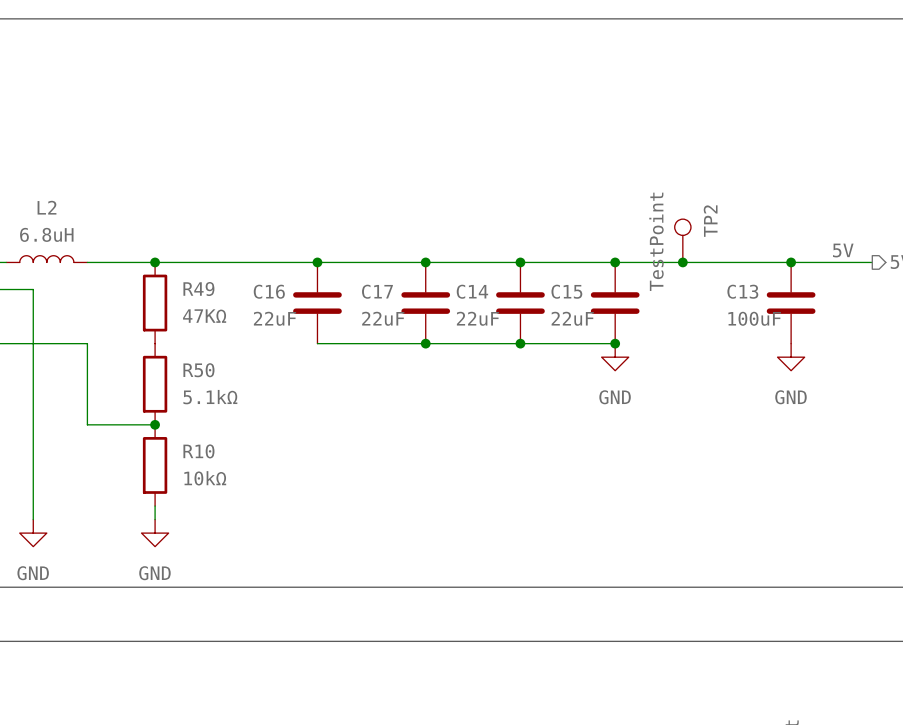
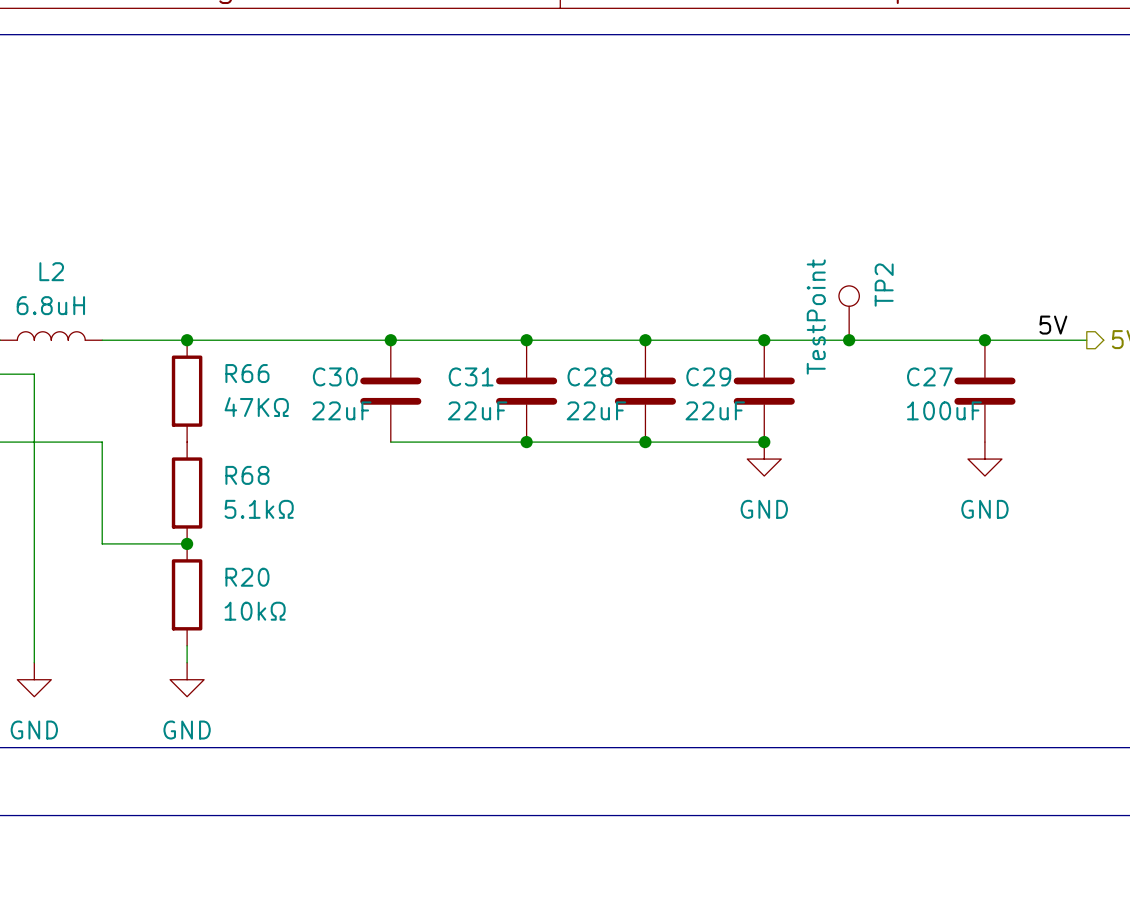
R49 name: R49 (198, 289) -> R66 (247, 373)
C16 name: C16 (269, 291) -> C30 (335, 376)
C17 name: C17 (377, 291) -> C31 (471, 376)
C14 name: C14 (472, 291) -> C28 (589, 376)
C15 name: C15 (566, 291) -> C29 (708, 376)
C13 name: C13 (742, 291) -> C27 (929, 376)
R50 name: R50 (198, 370) -> R68 (247, 475)
R10 name: R10 (198, 451) -> R20 (247, 577)

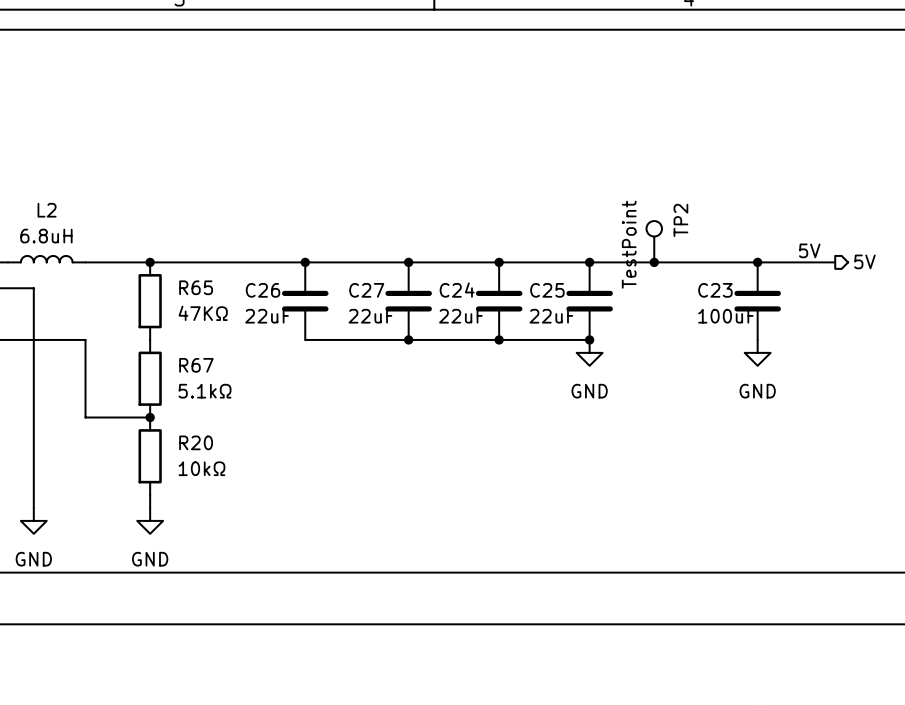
R66 name: R66 (247, 373) -> R65 (196, 287)
C30 name: C30 (335, 376) -> C26 (263, 290)
C31 name: C31 (471, 376) -> C27 (366, 290)
C28 name: C28 (589, 376) -> C24 (457, 290)
C29 name: C29 (708, 376) -> C25 (547, 290)
C27 name: C27 (929, 376) -> C23 (715, 290)
R68 name: R68 (247, 475) -> R67 (196, 365)

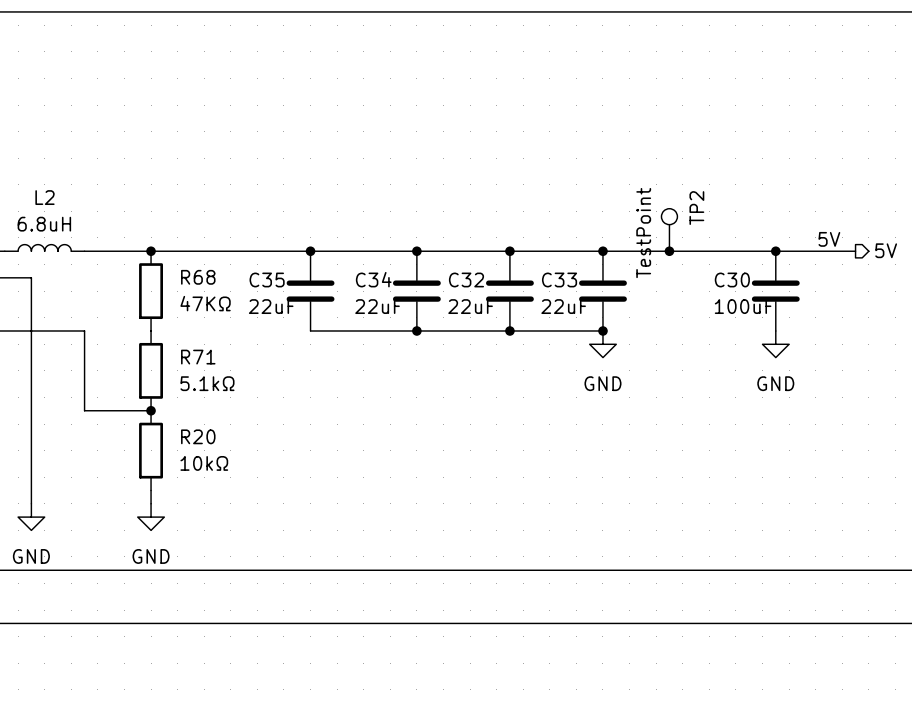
R65 name: R65 (196, 287) -> R68 (198, 277)
C26 name: C26 (263, 290) -> C35 (267, 279)
C27 name: C27 (366, 290) -> C34 (373, 279)
C24 name: C24 (457, 290) -> C32 (466, 279)
C25 name: C25 (547, 290) -> C33 (559, 279)
C23 name: C23 (715, 290) -> C30 (732, 279)
R67 name: R67 (196, 365) -> R71 (198, 357)

